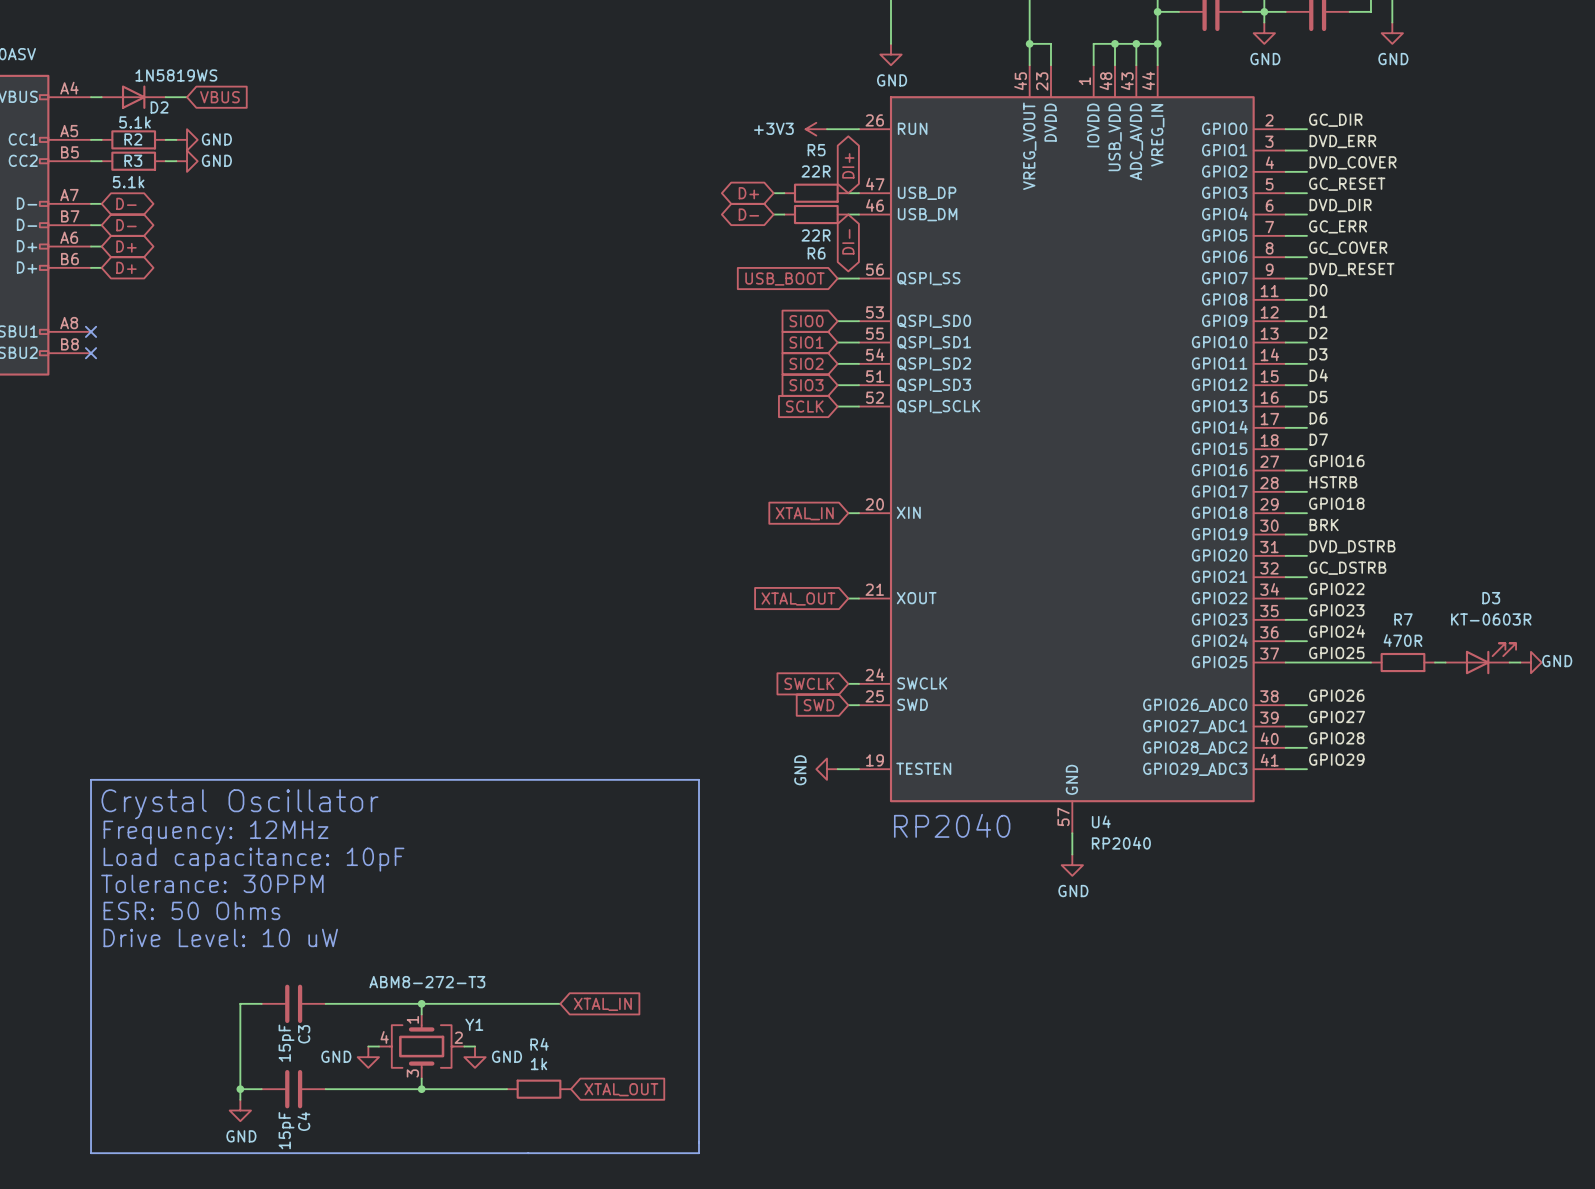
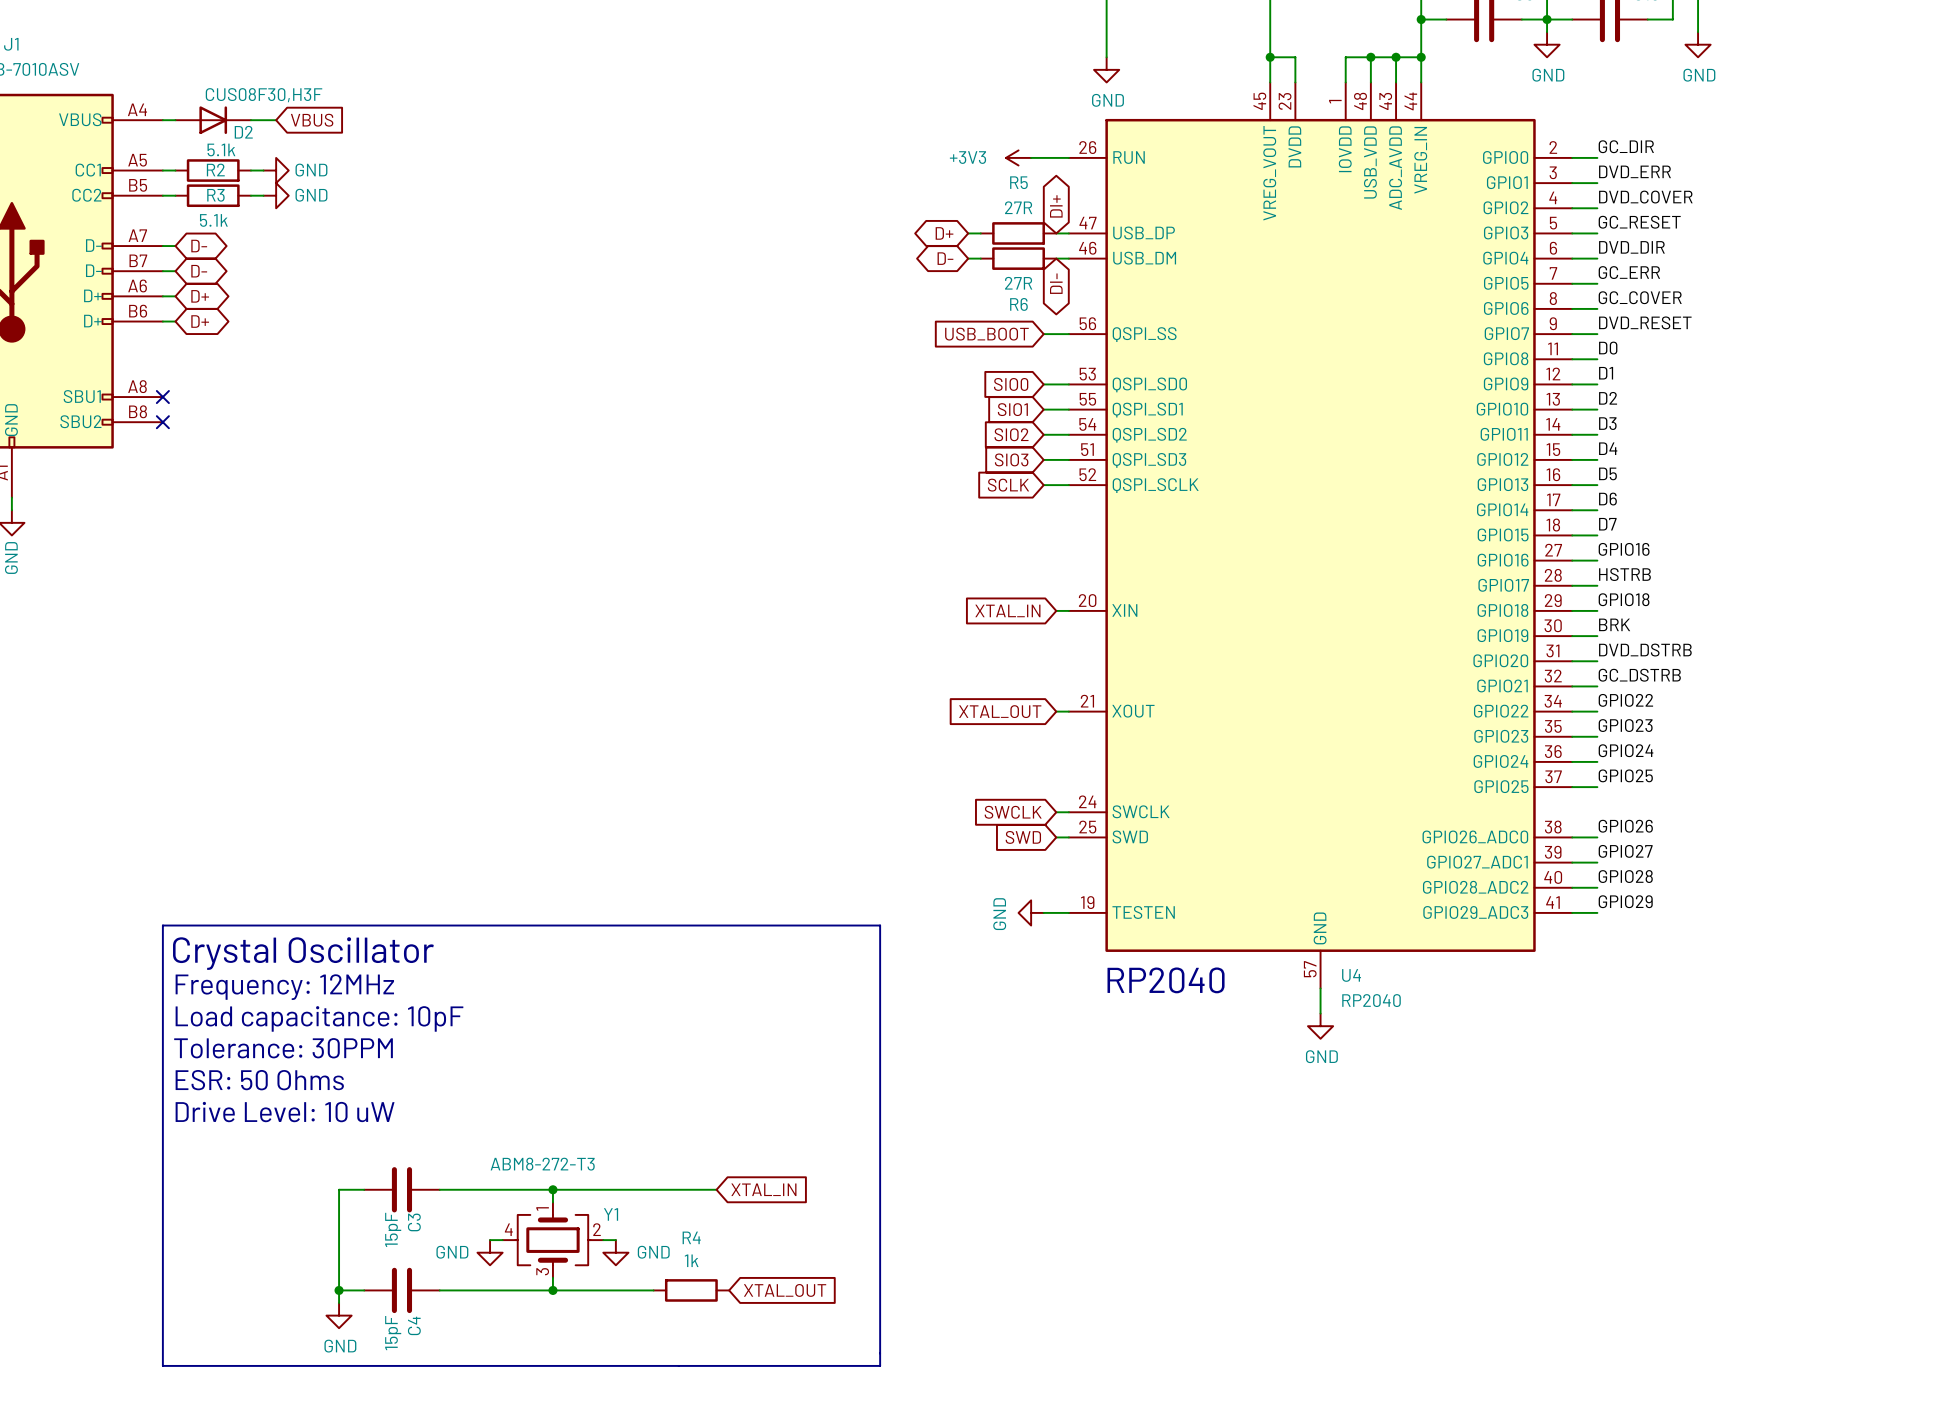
D2 value: 1N5819WS (176, 75) -> CUS08F30,H3F (264, 95)
R5 value: 22R (816, 171) -> 27R (1018, 207)
R6 value: 22R (816, 235) -> 27R (1018, 283)
D3: KT-0603R (1480, 658) -> none
wire: (1306, 662) (1370, 662) -> none
R7: 470R (1402, 662) -> none
wire: (1434, 662) (1445, 662) -> none
wire: (1509, 662) (1520, 662) -> none
power symbol: GND (1530, 662) -> none

